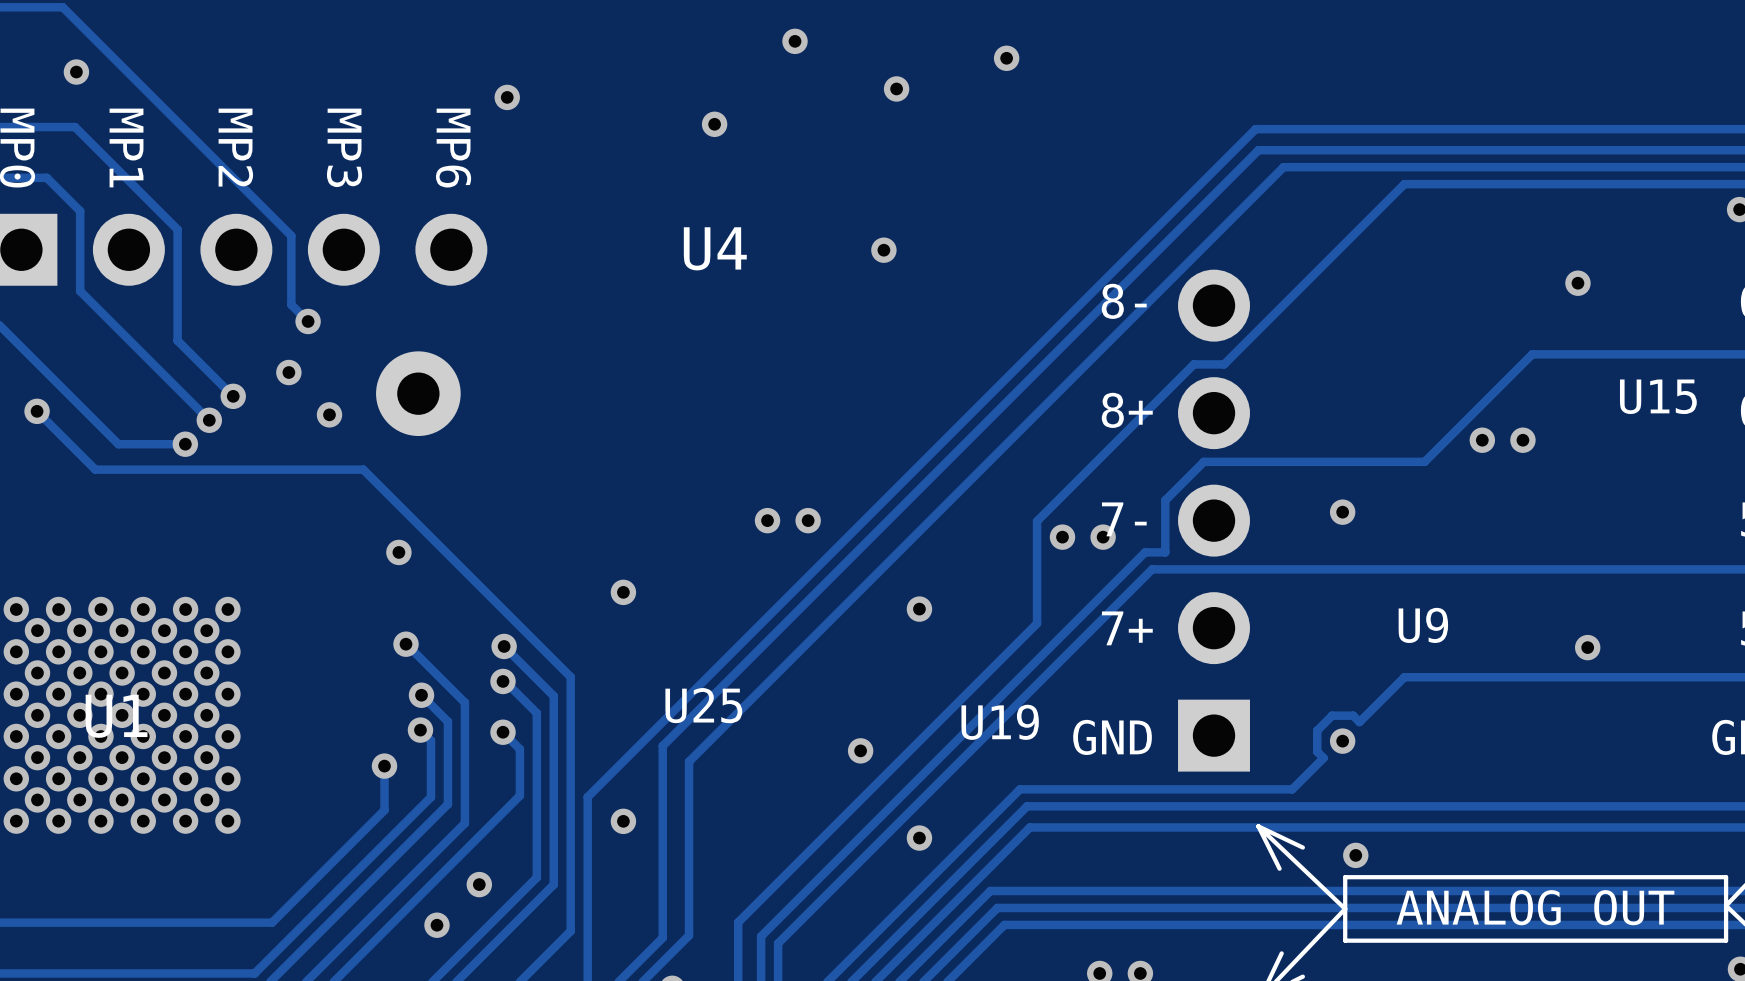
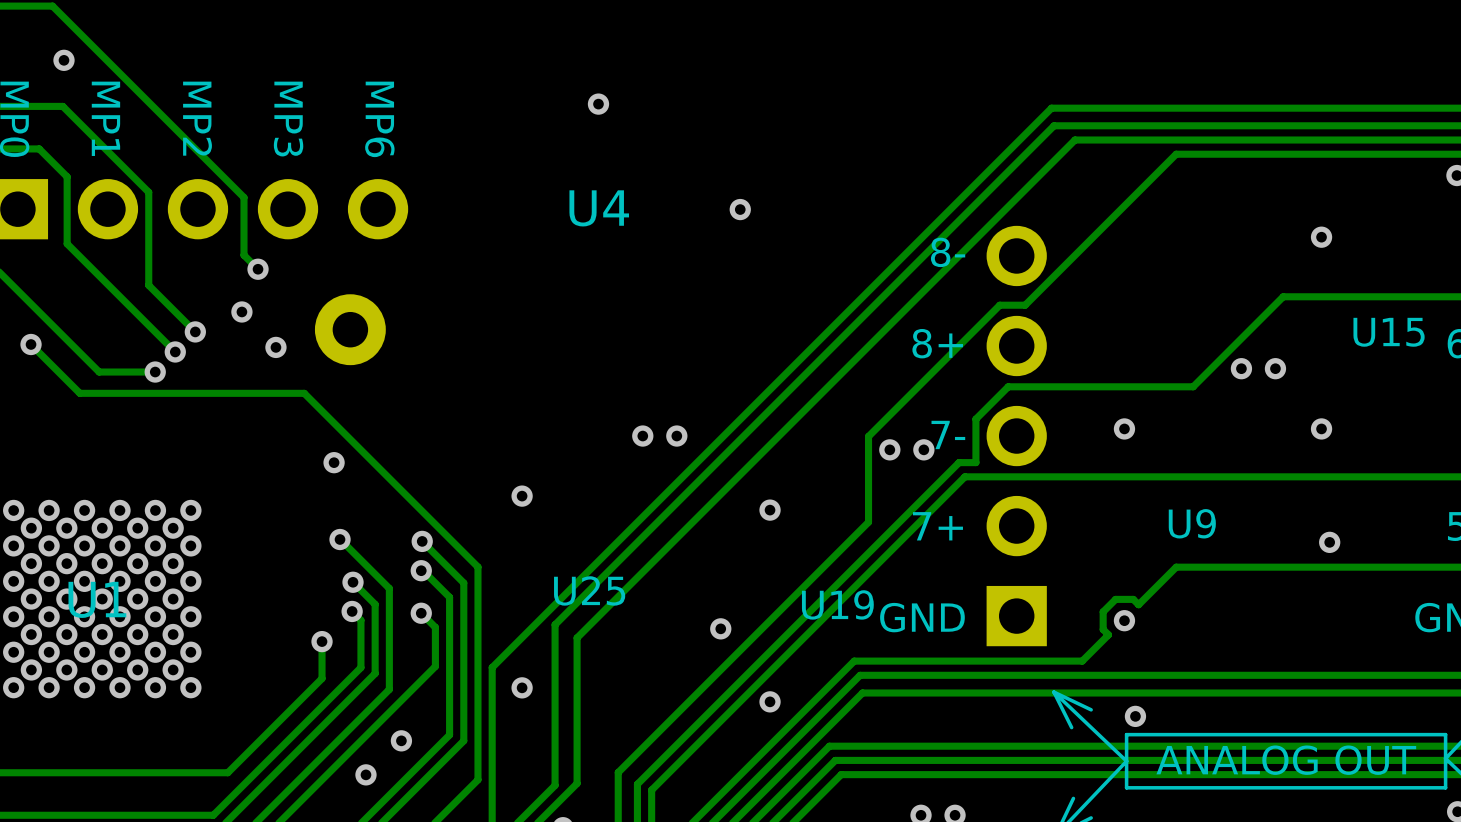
via: (795, 41) -> none
via: (1006, 58) -> none
via: (896, 88) -> none
via: (507, 97) -> none
via: none -> (1321, 428)

